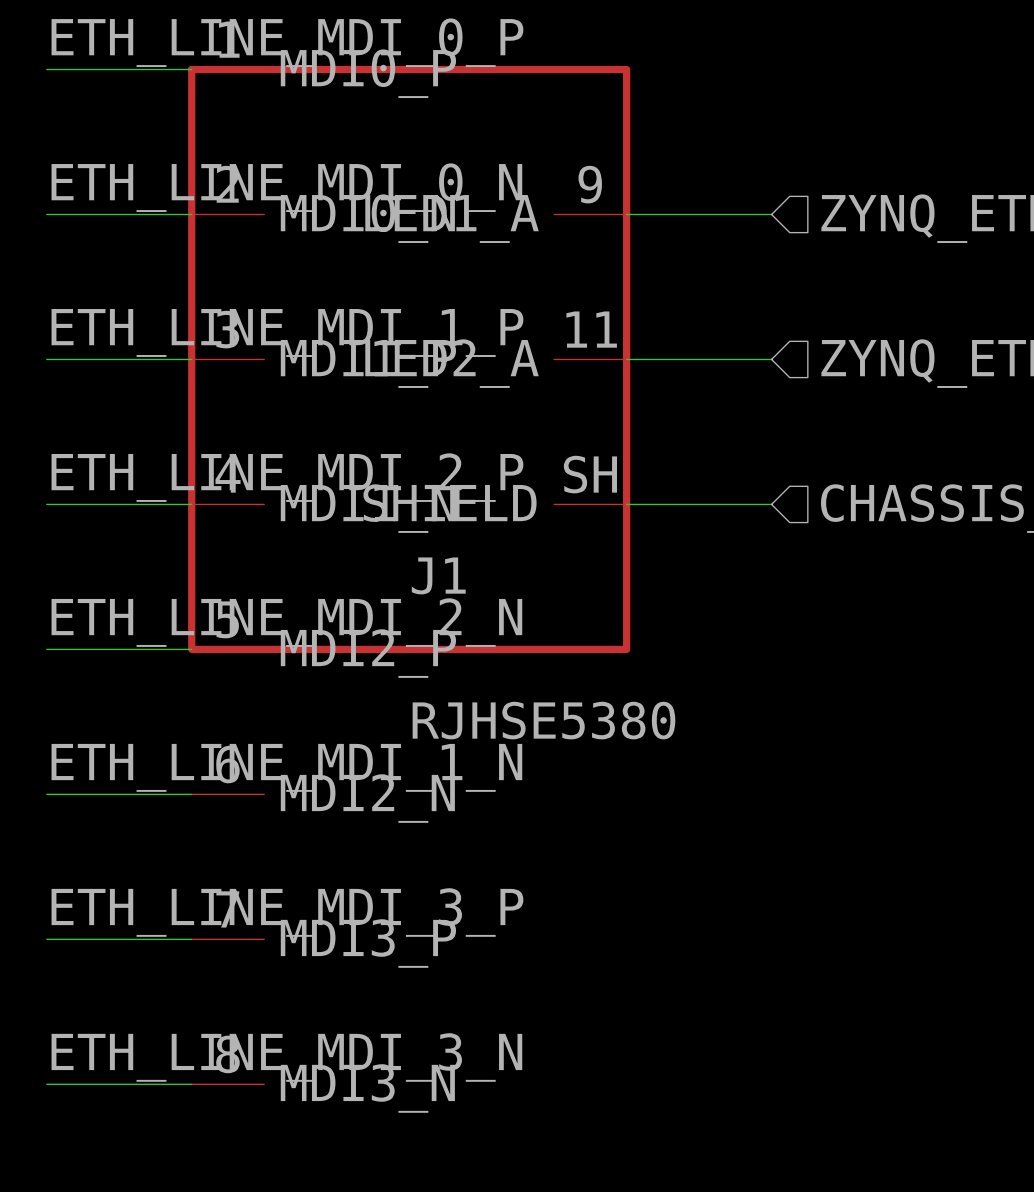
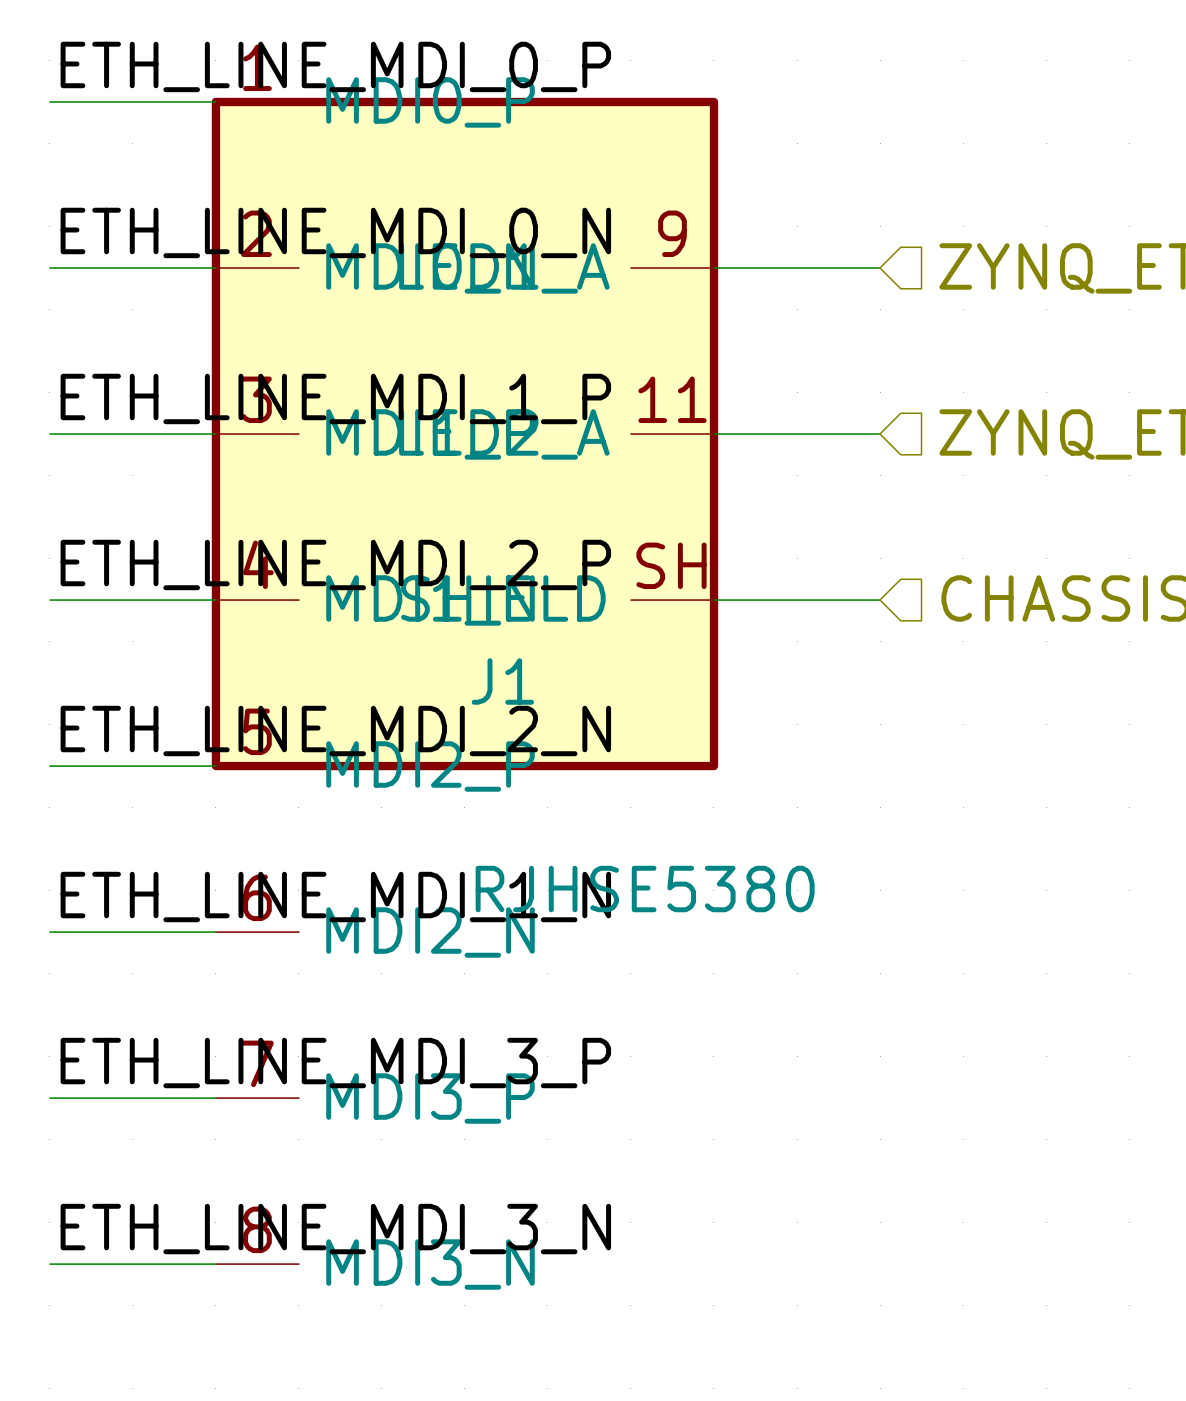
J1 value position: RJHSE5380 (543, 720) -> RJHSE5380 (645, 889)

